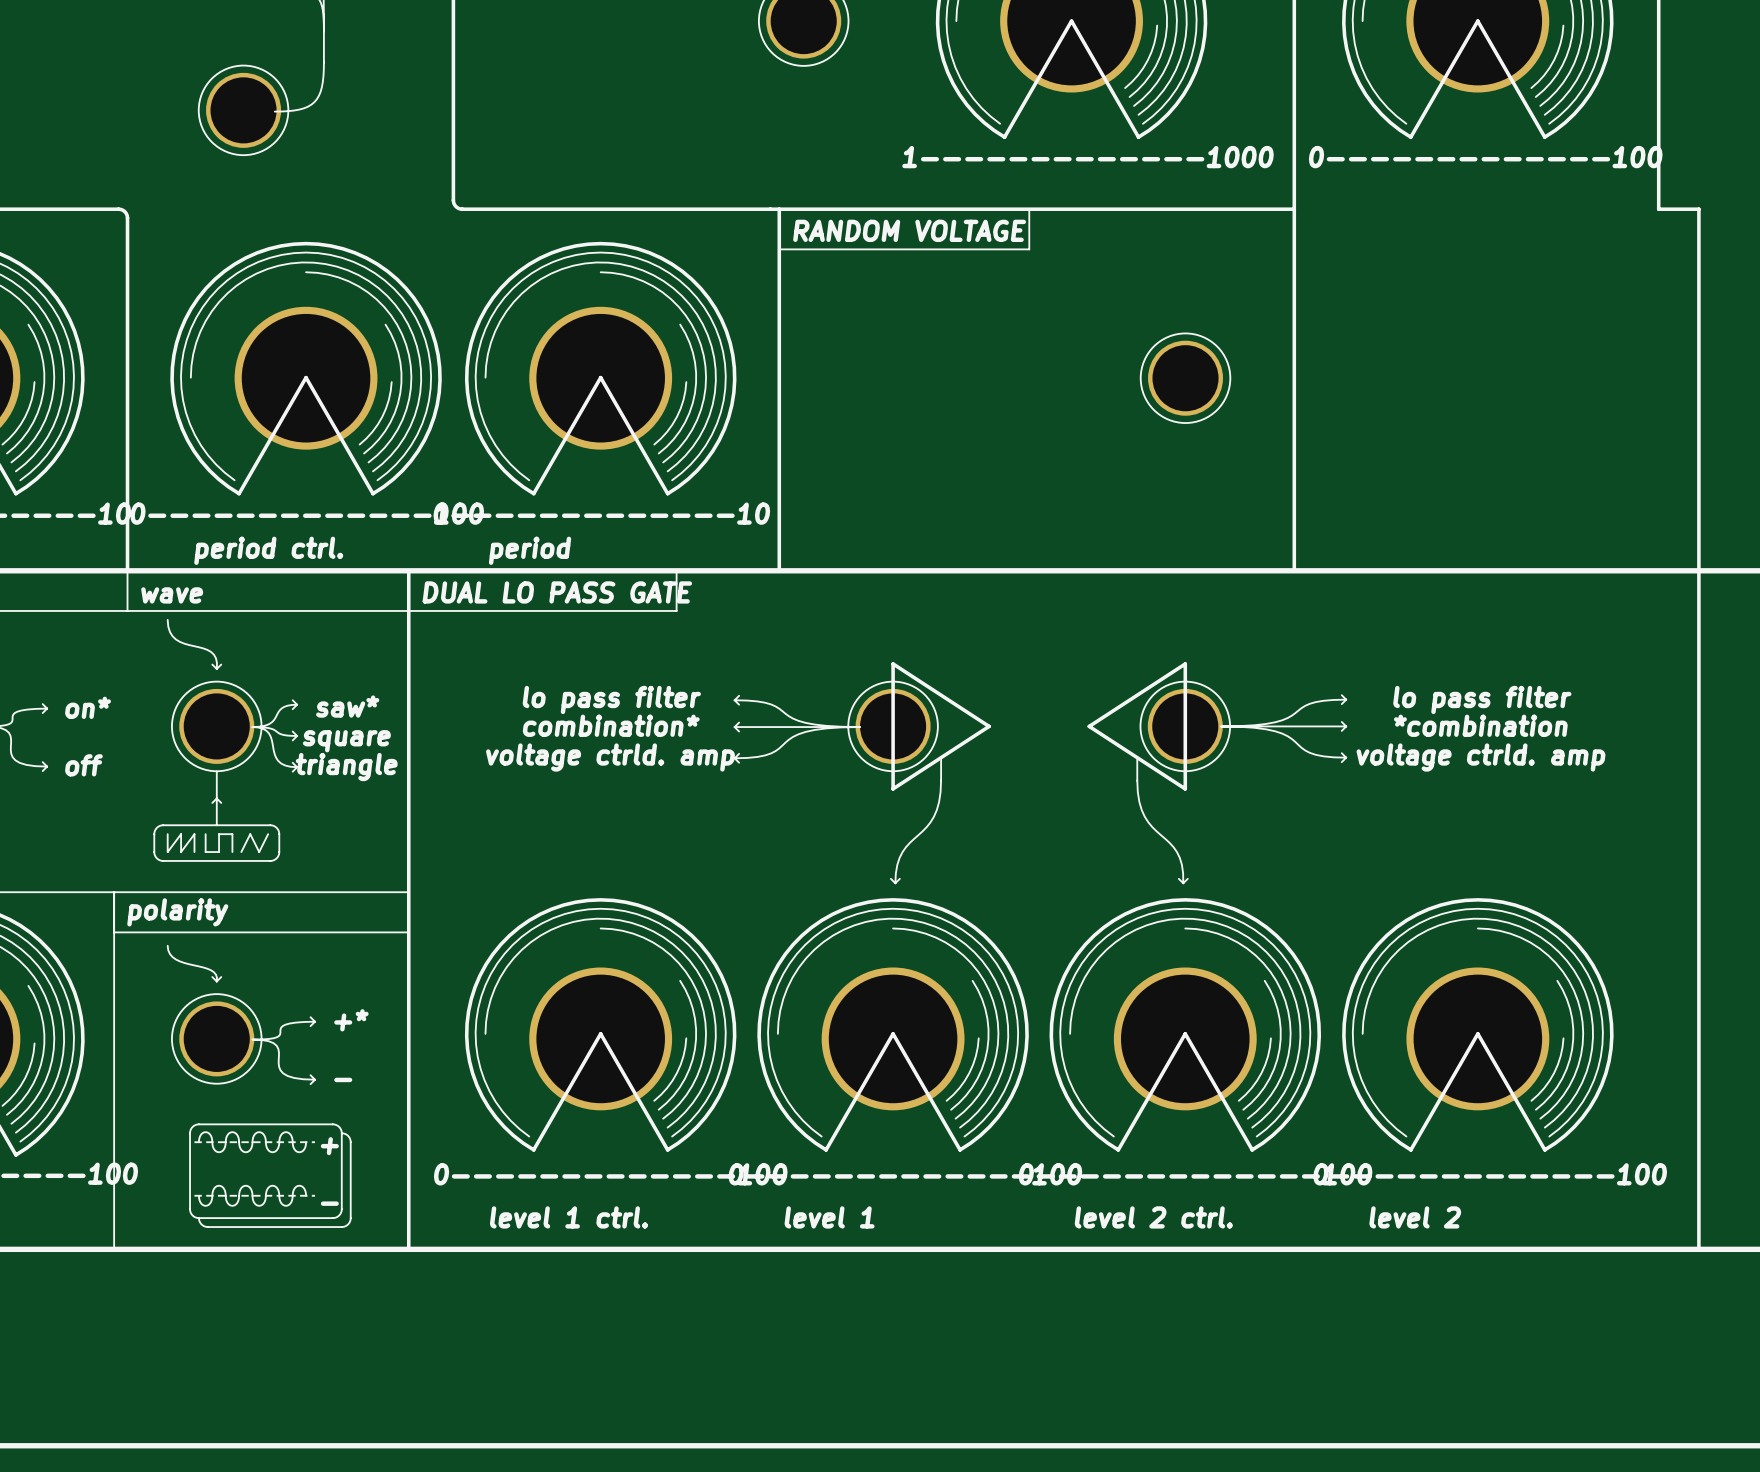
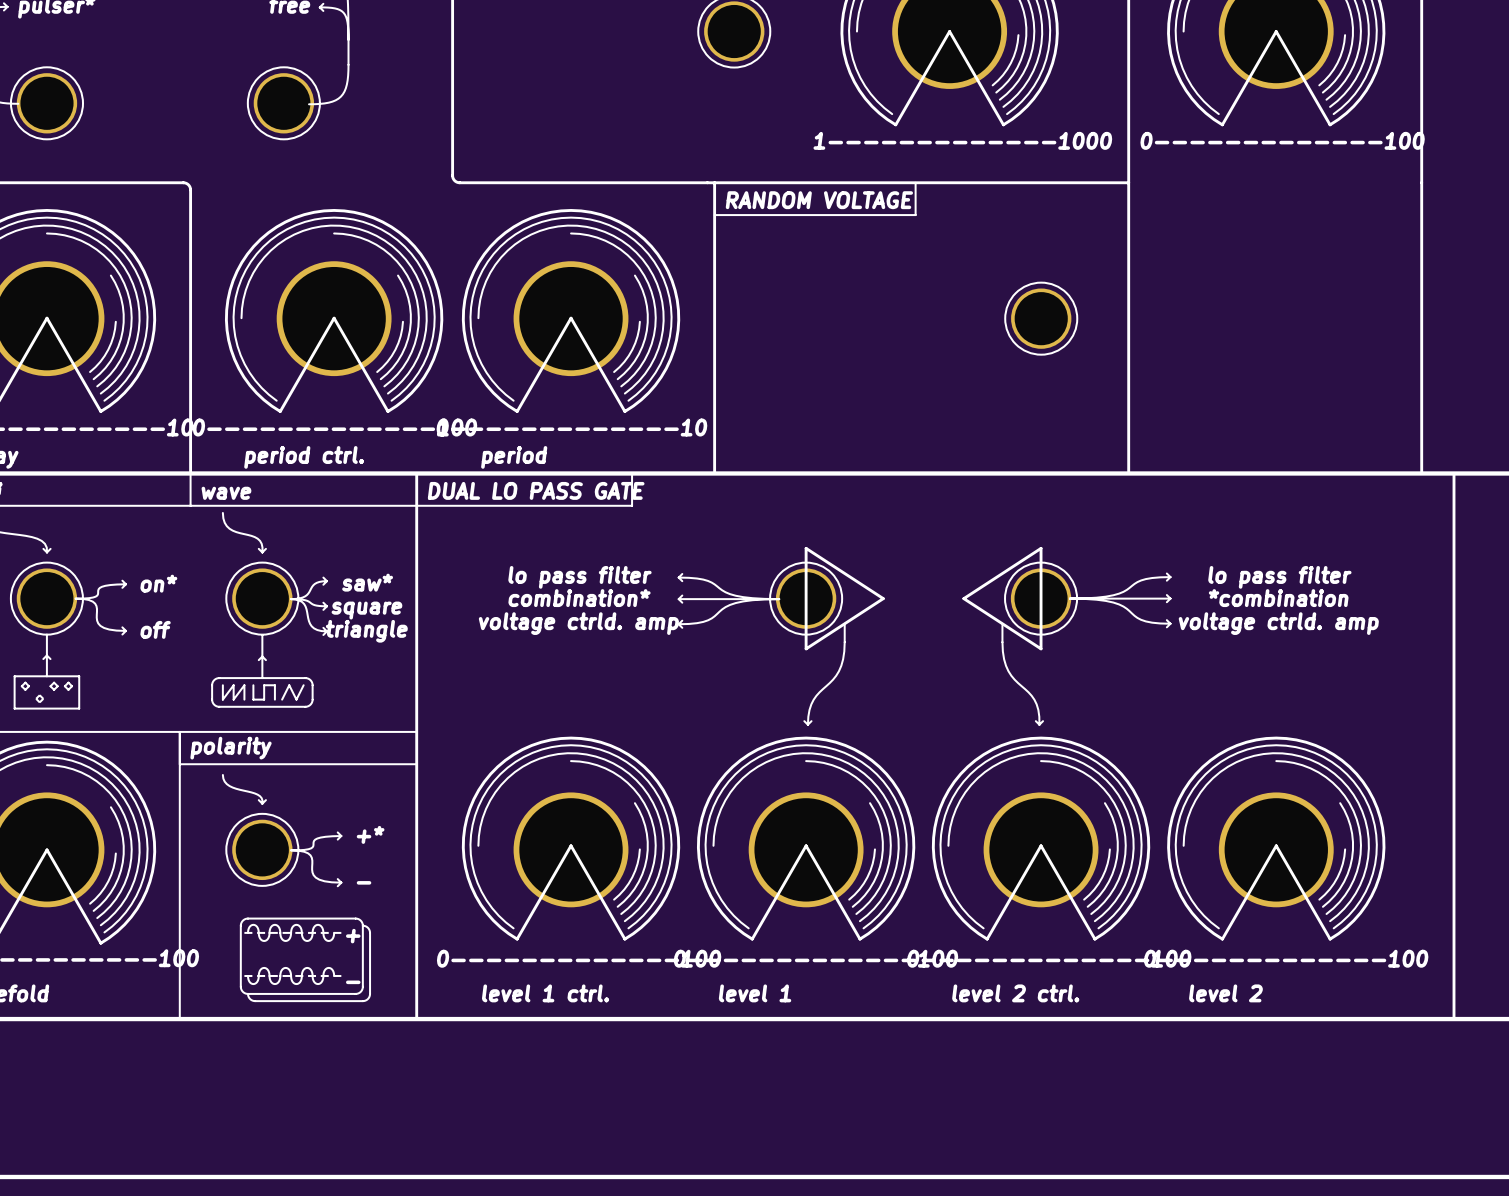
line: (1658, 209) (1698, 209) (1698, 570) -> (1421, 182) (1421, 473)

